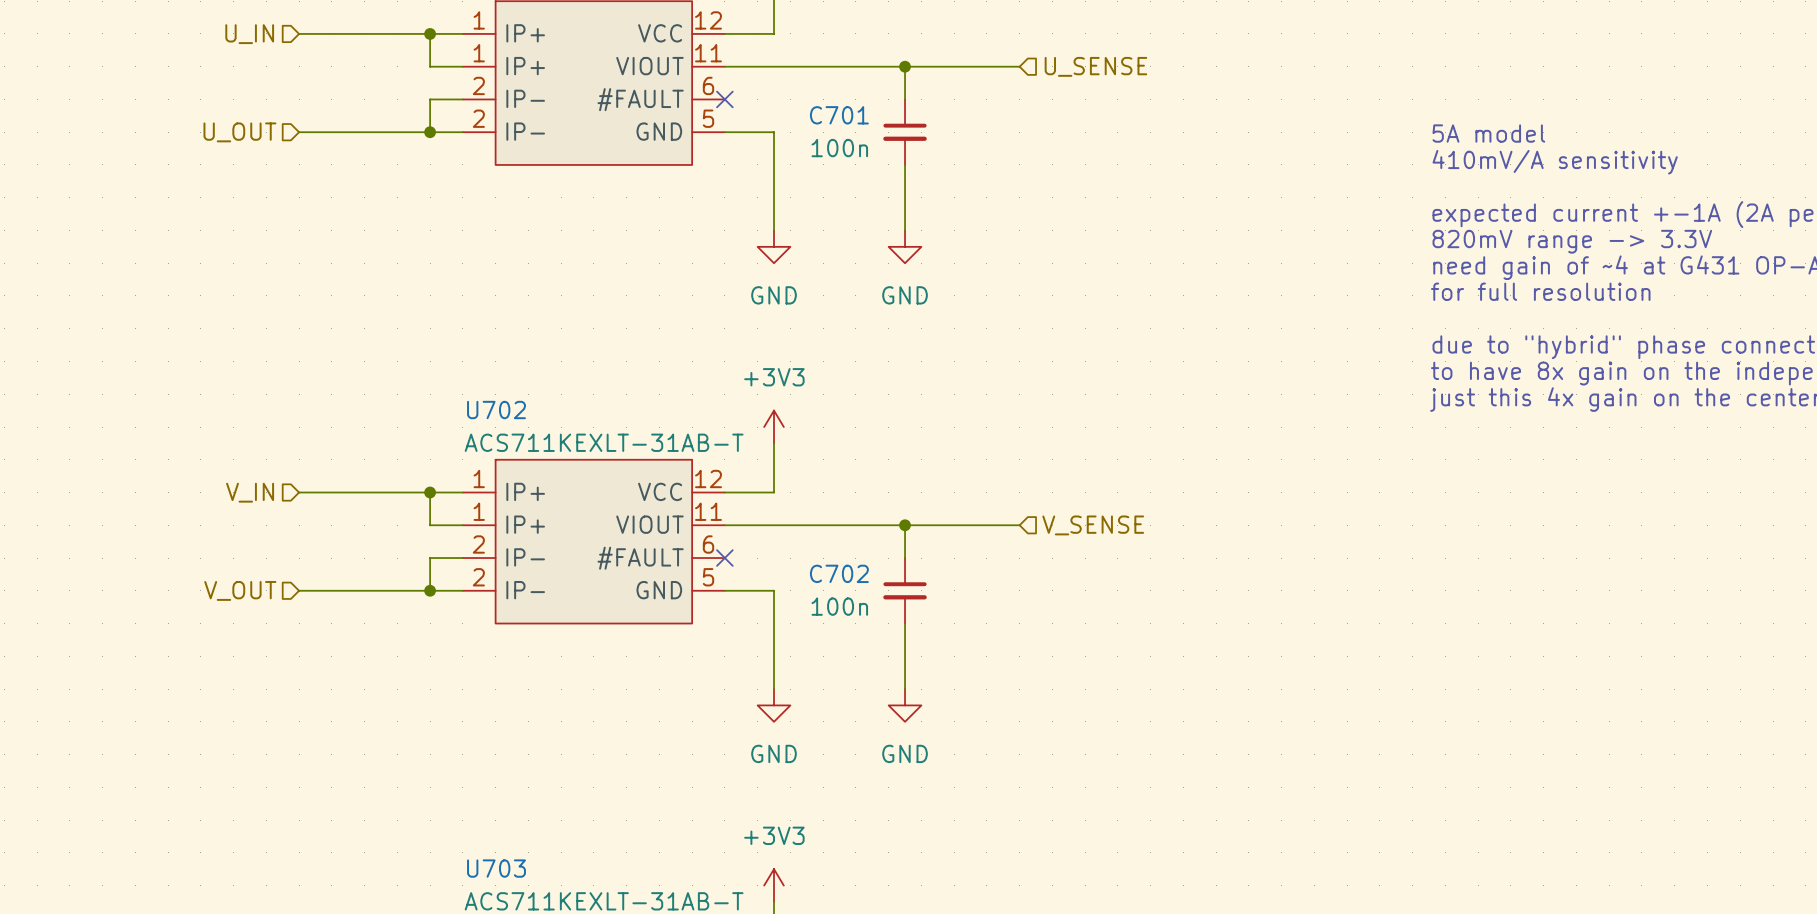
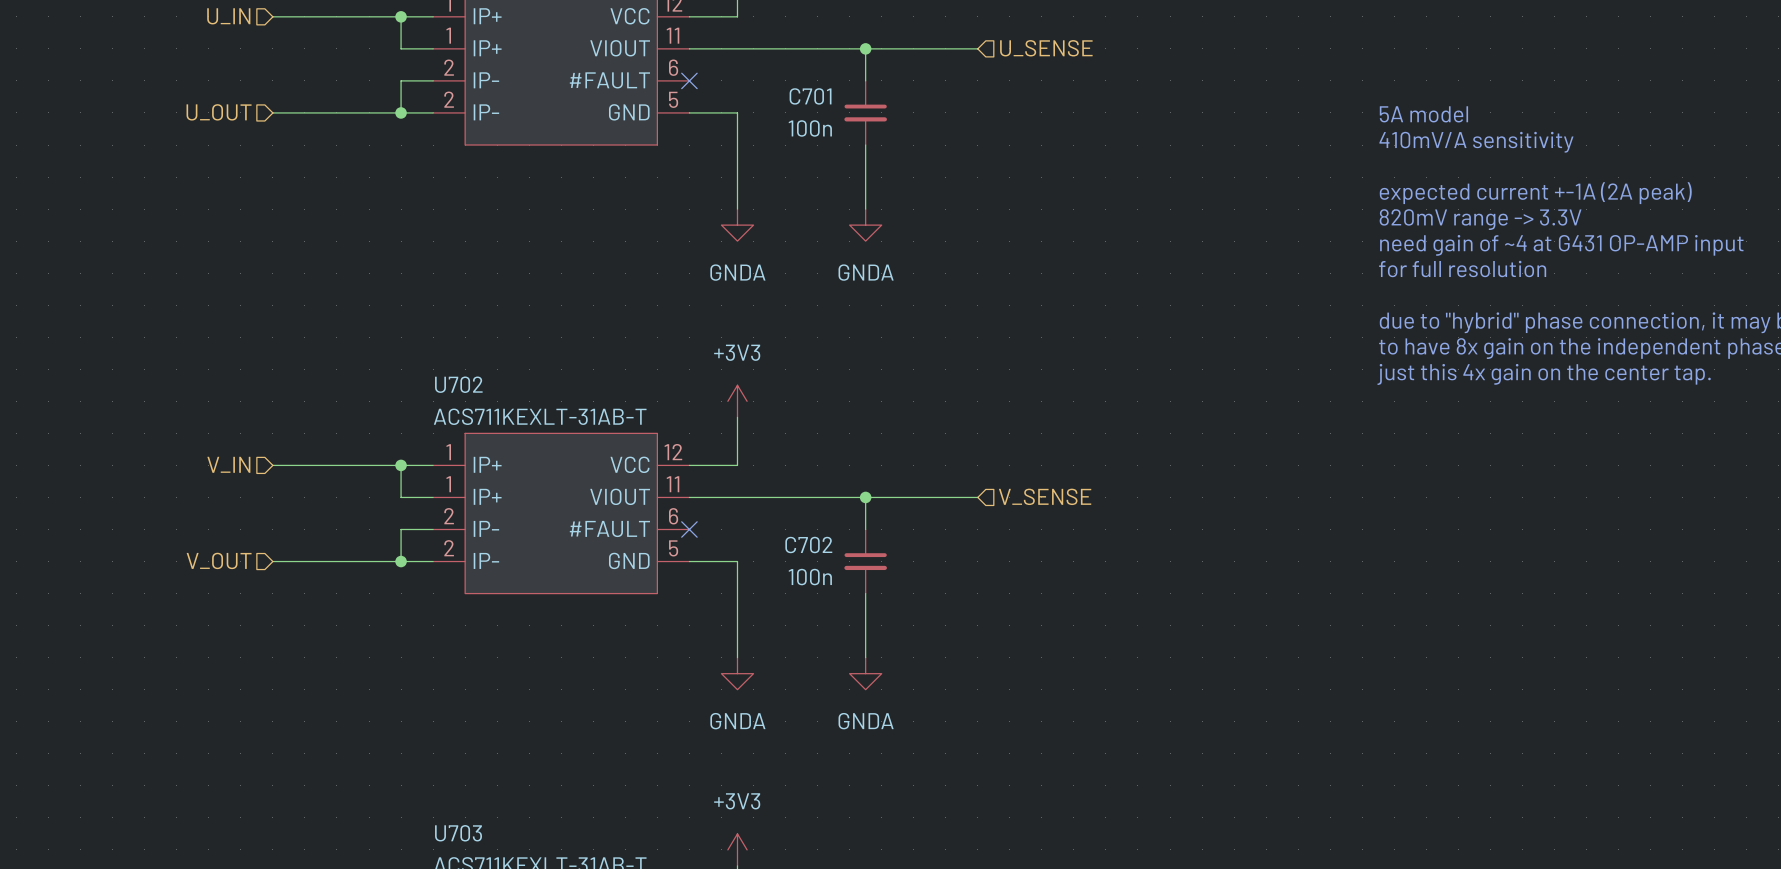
power symbol: GND (774, 246) -> GNDA (737, 225)
power symbol: GND (905, 246) -> GNDA (865, 225)
power symbol: GND (774, 705) -> GNDA (737, 673)
power symbol: GND (905, 705) -> GNDA (865, 673)

